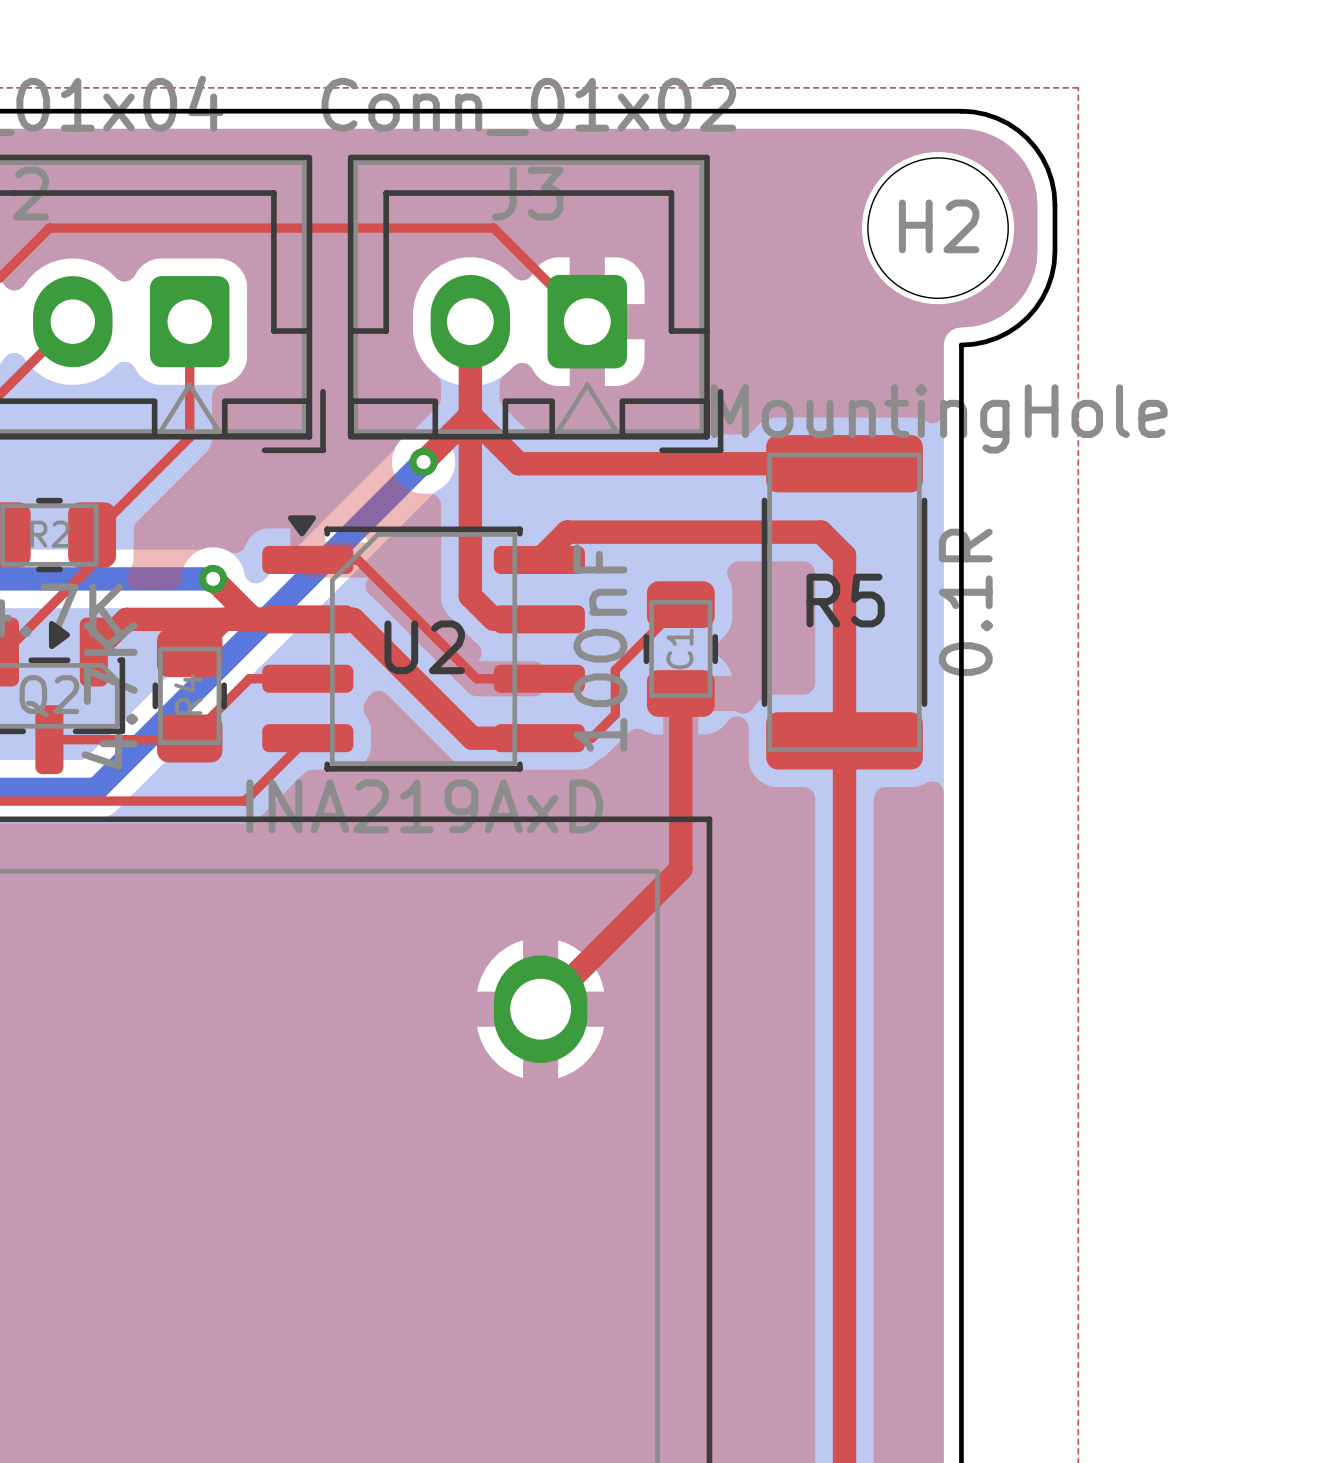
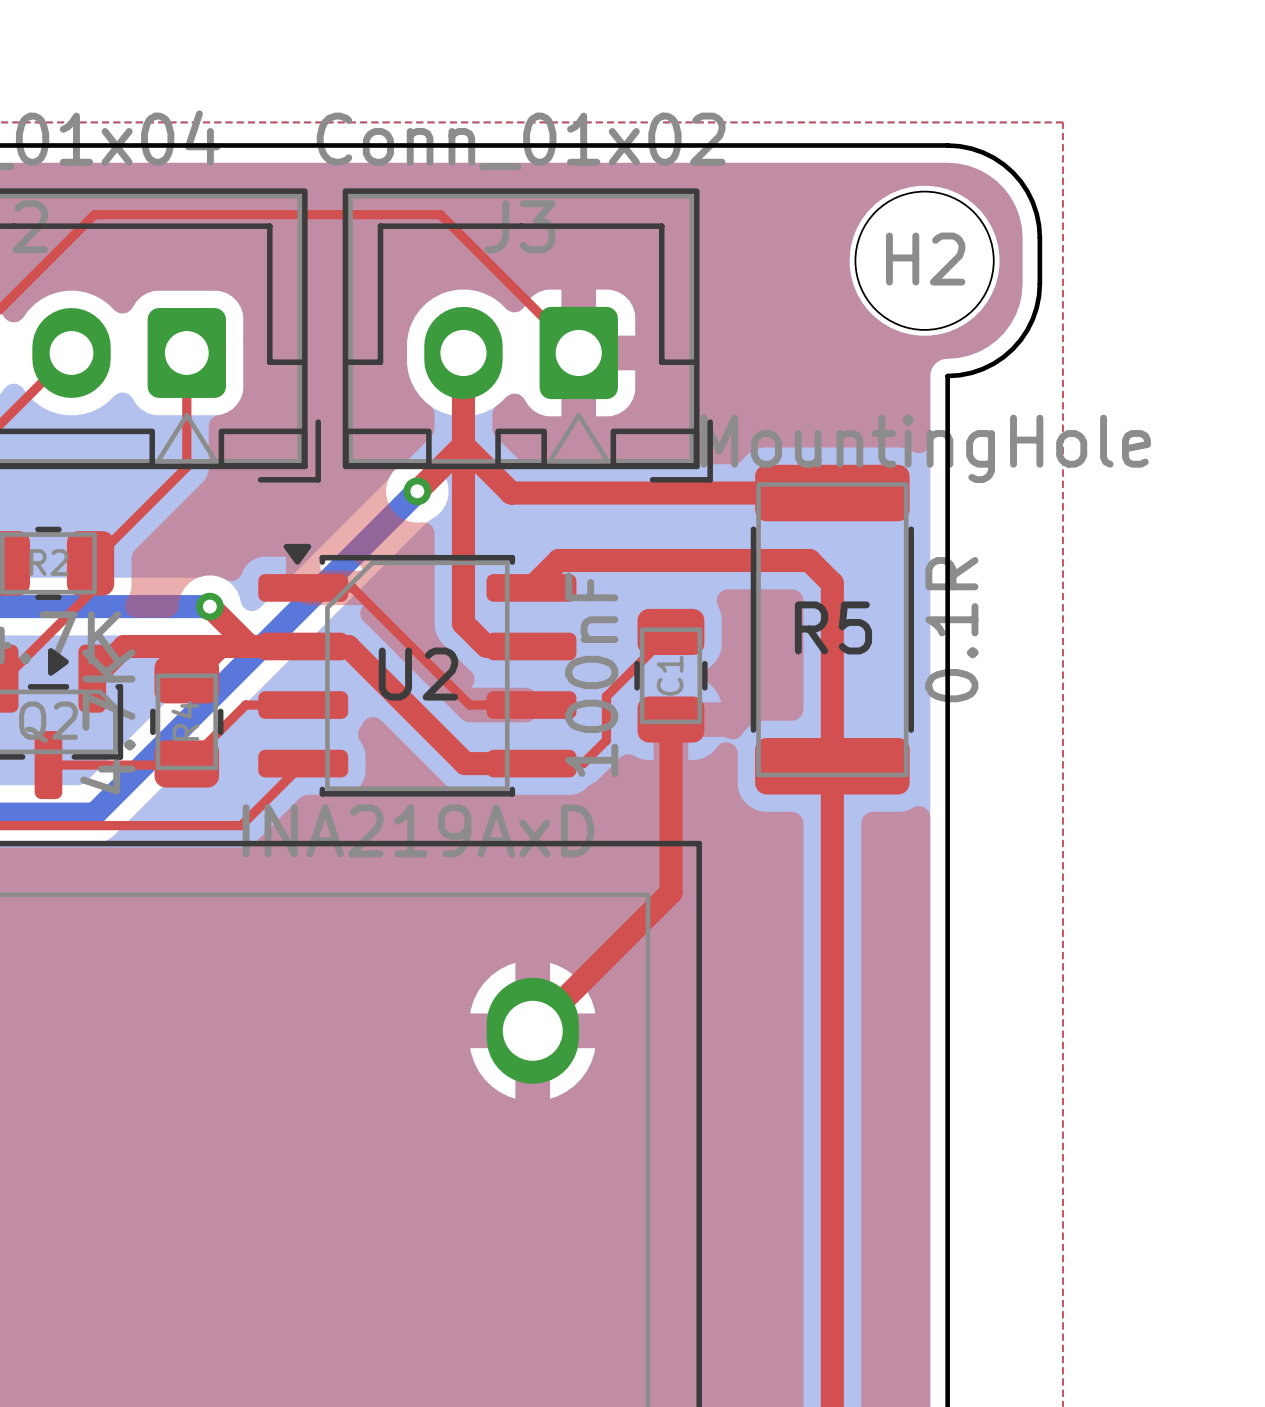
top track: (49, 228) (493, 228) -> (48, 260) (94, 214) (440, 214) (486, 260)

